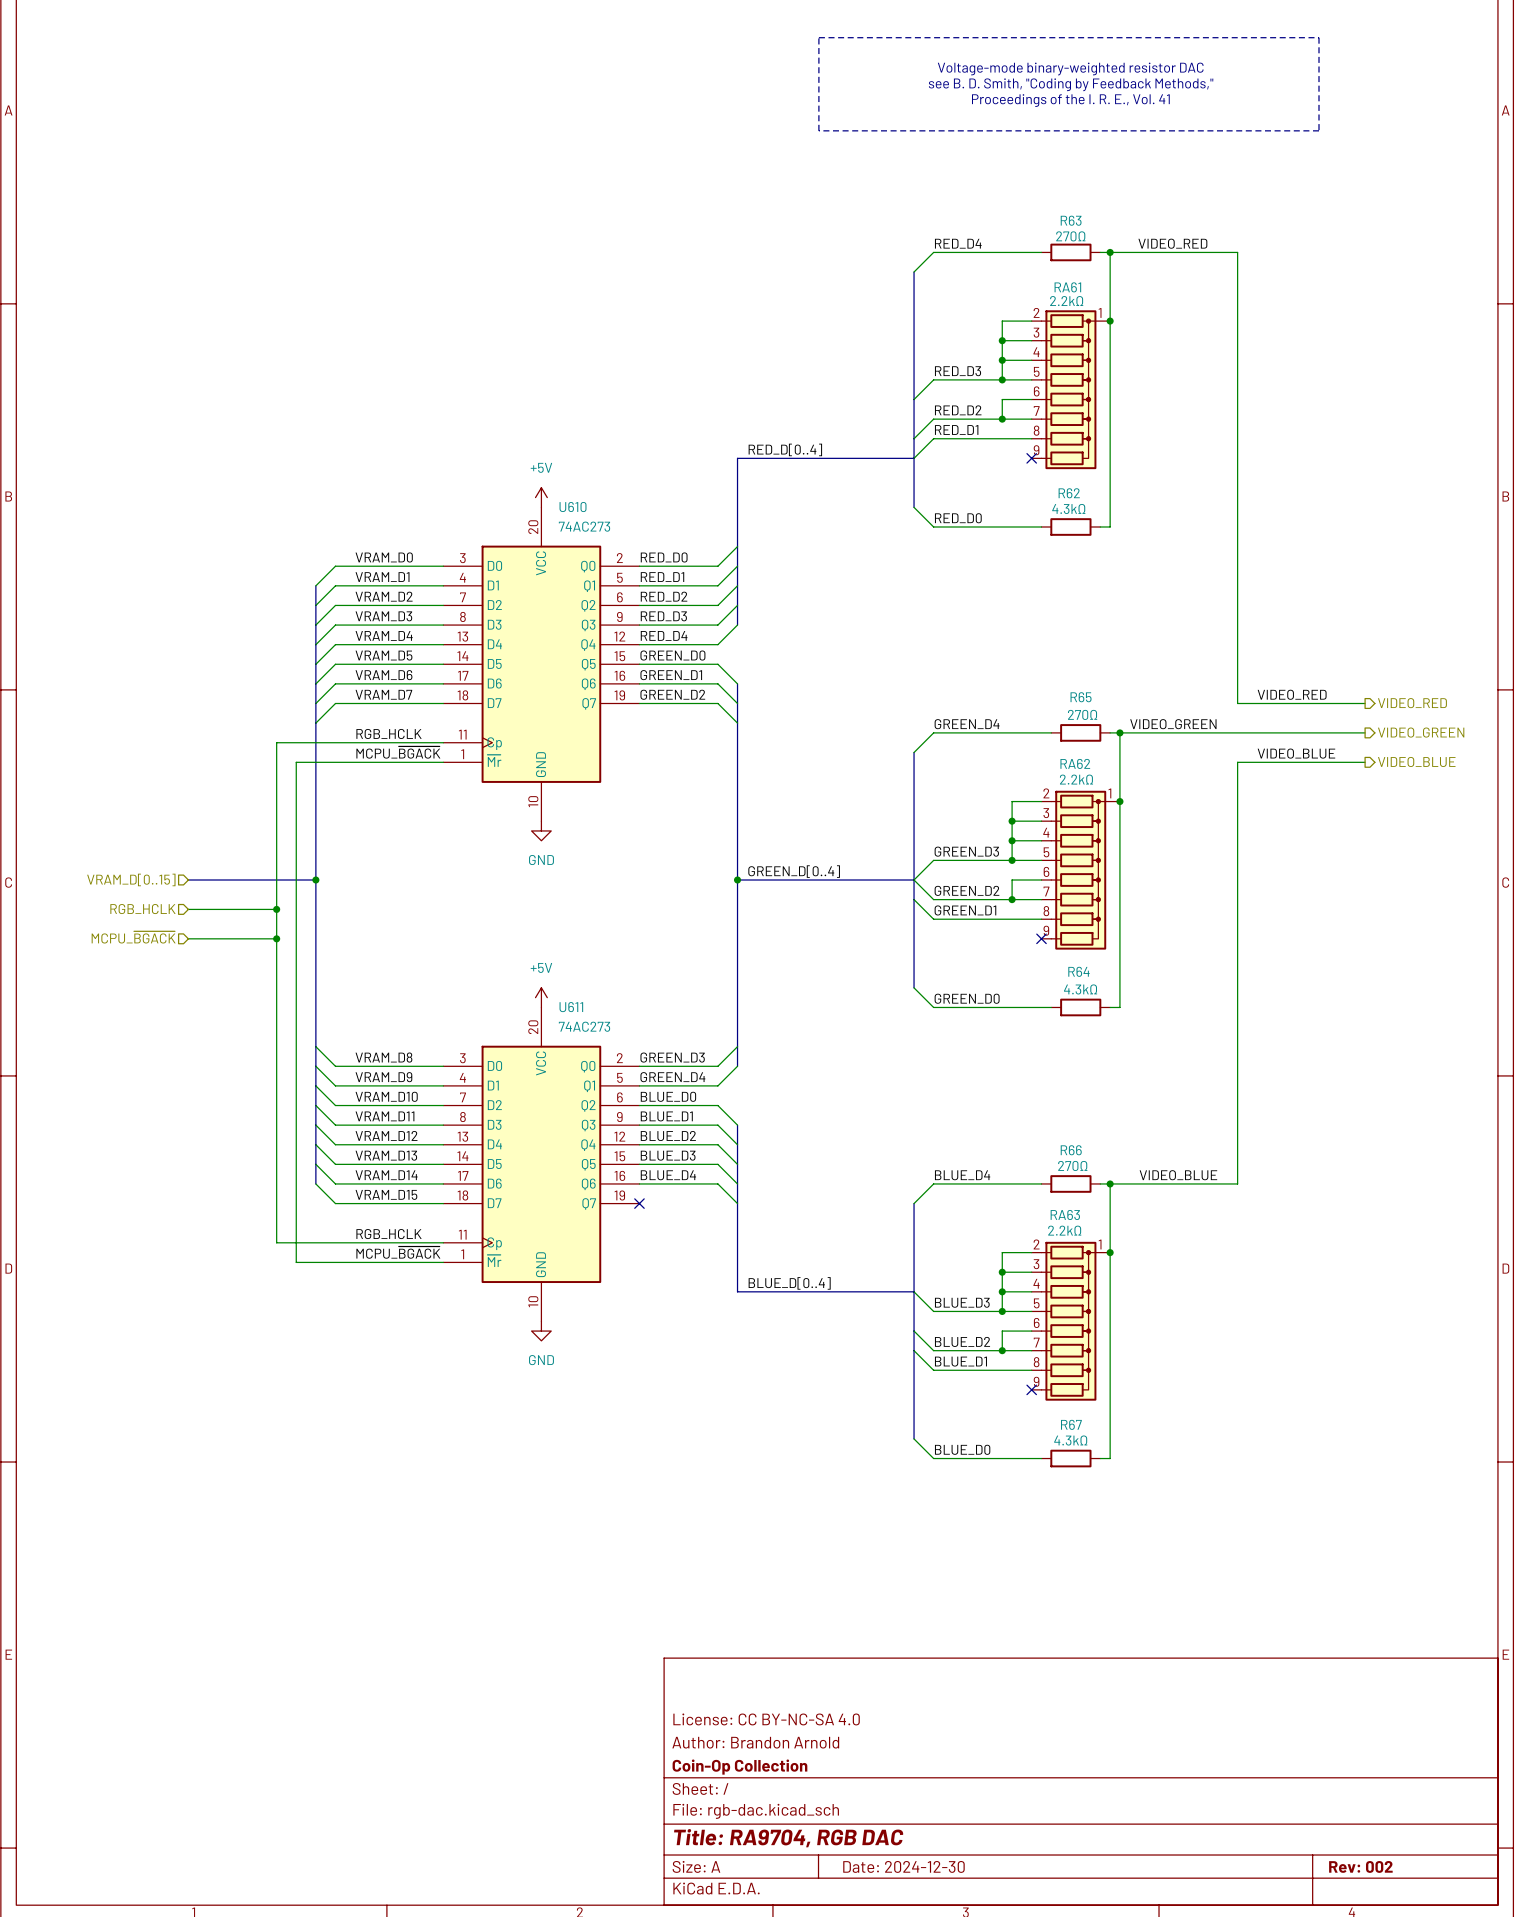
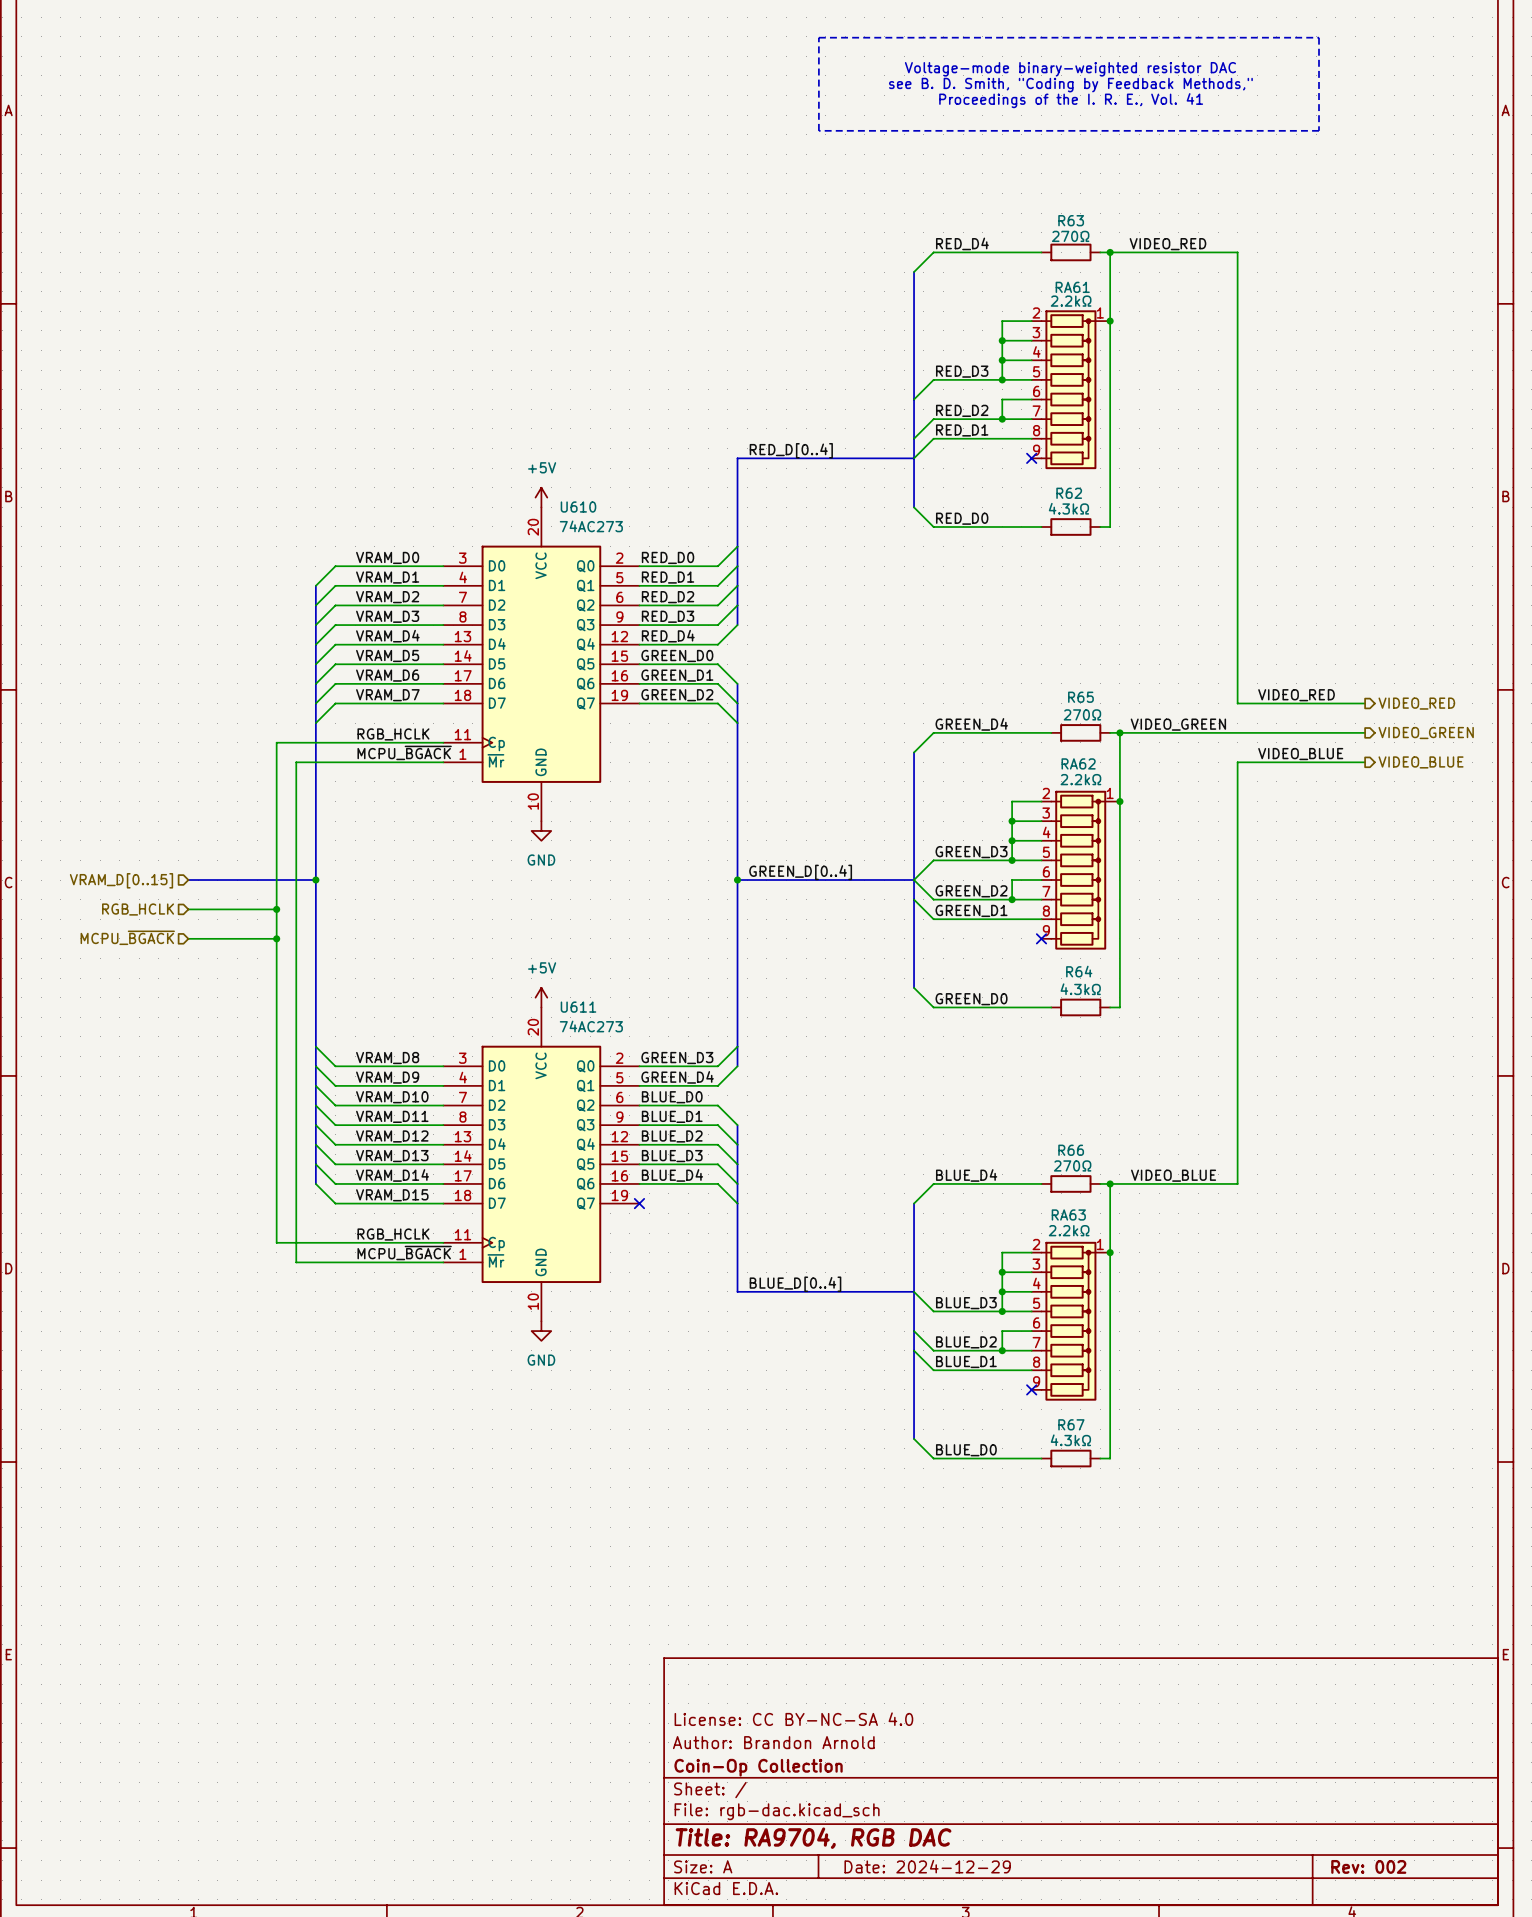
title block: Date: 2024-12-30 (903, 1866) -> Date: 2024-12-29 (927, 1866)

